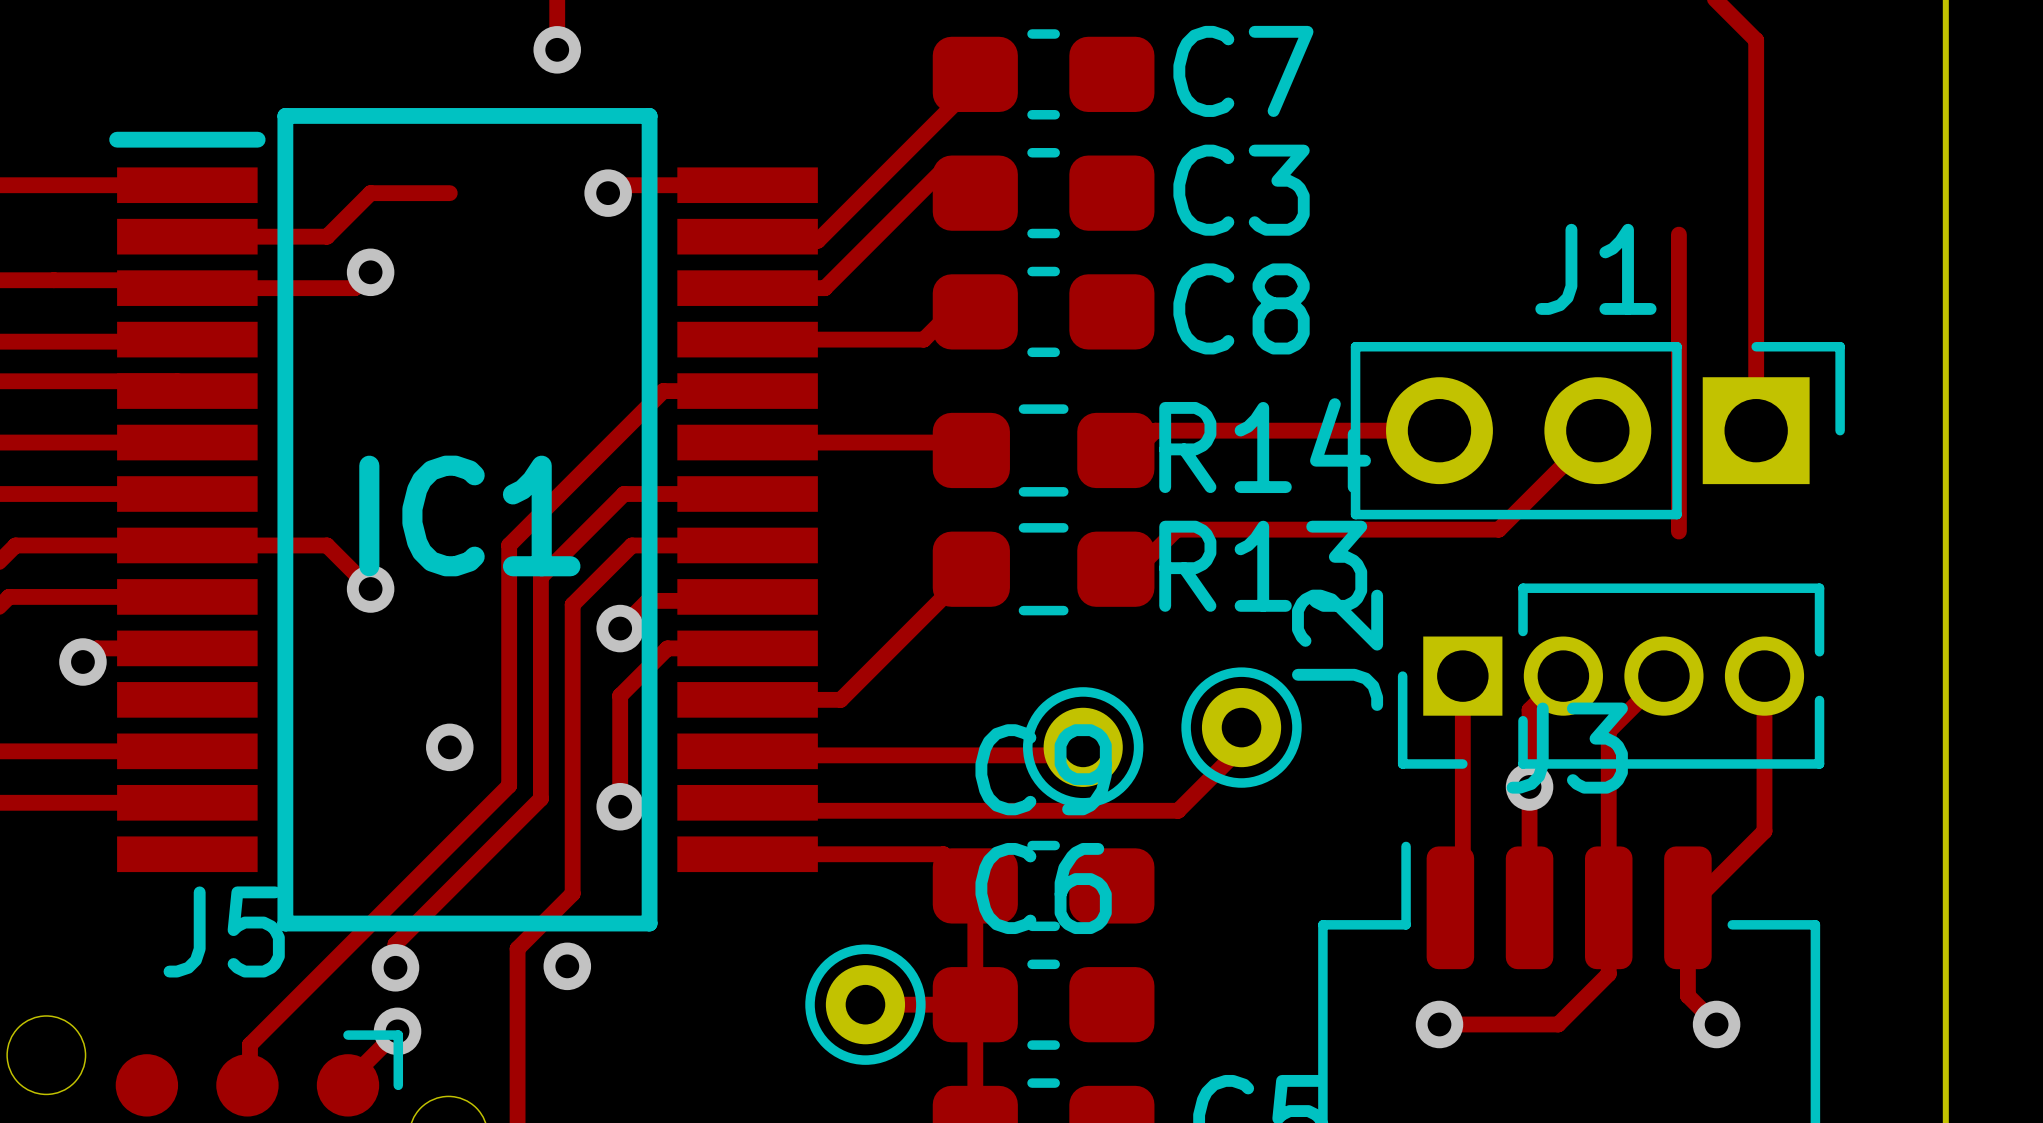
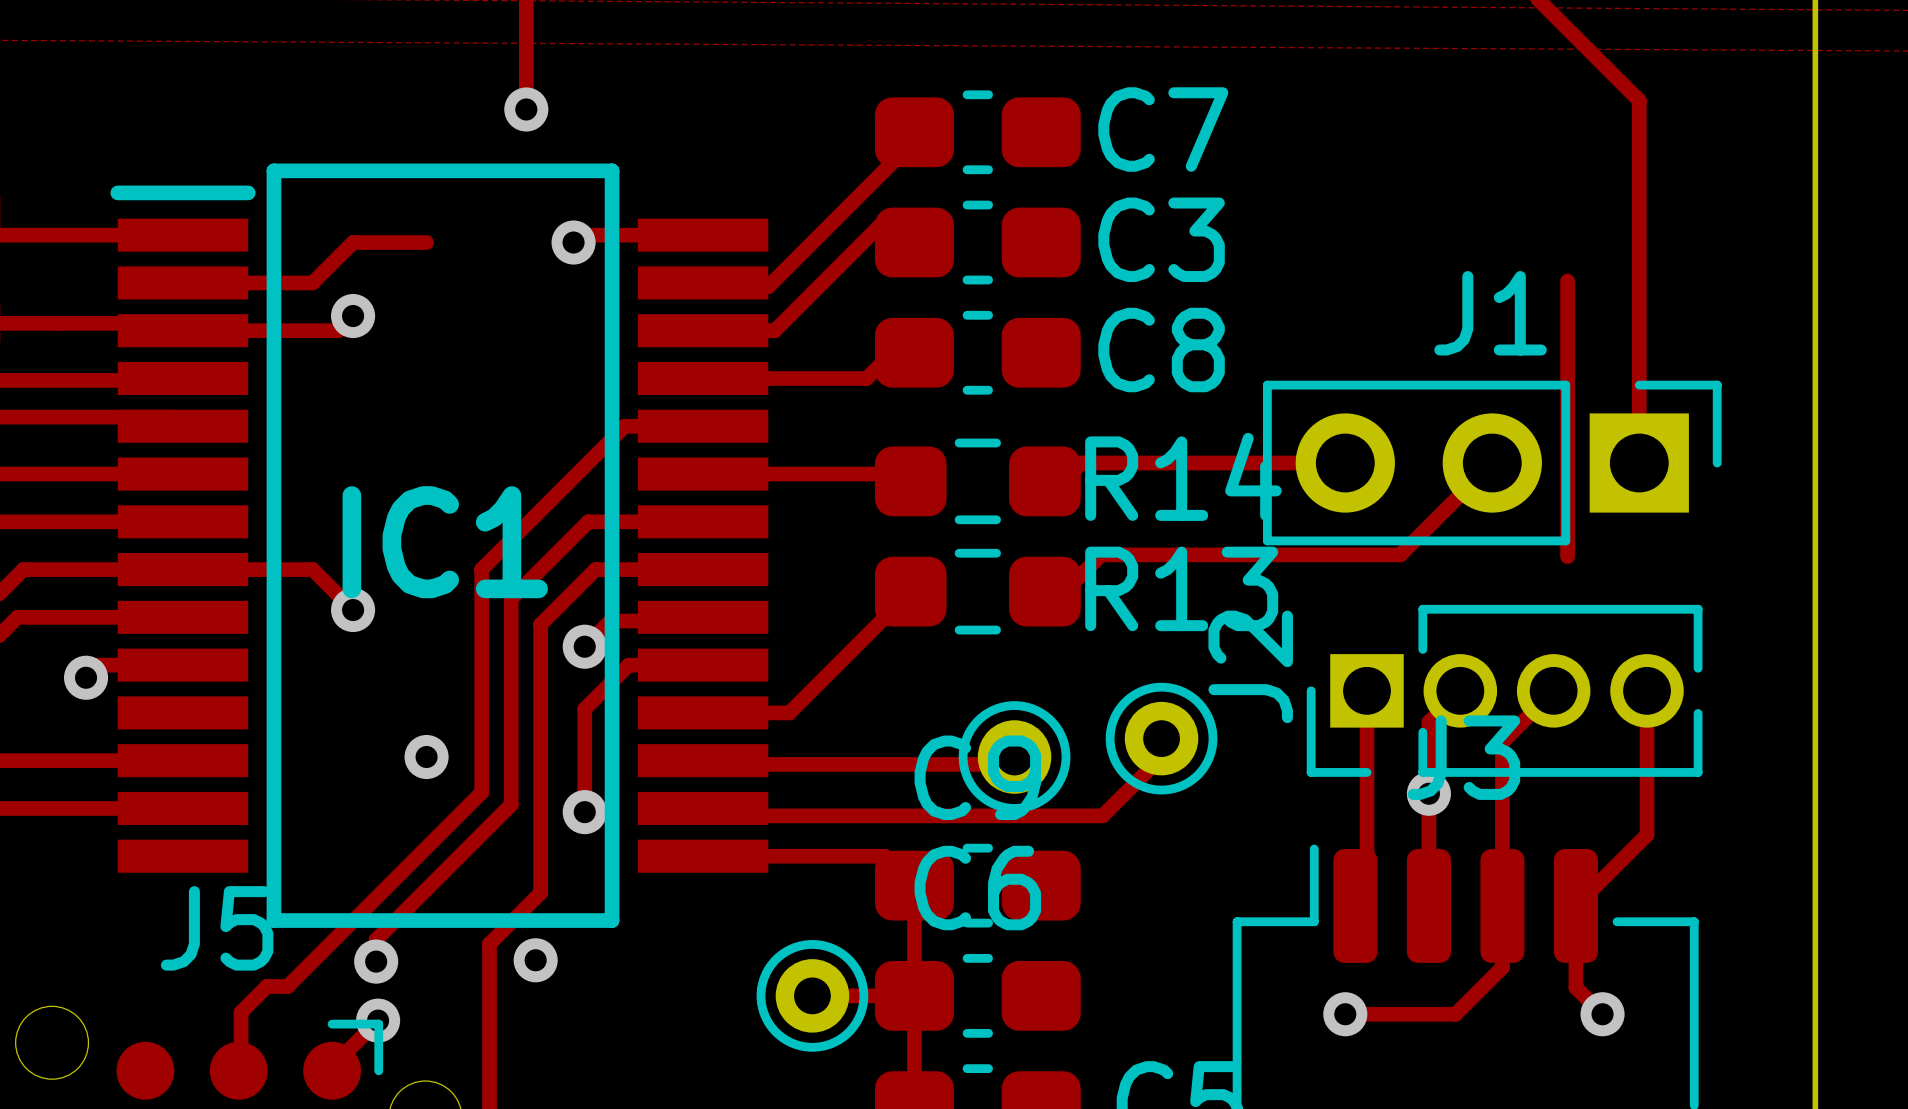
track: (300, 994) (249, 1044) -> (287, 986) (266, 986) (241, 1012) (241, 1033)

